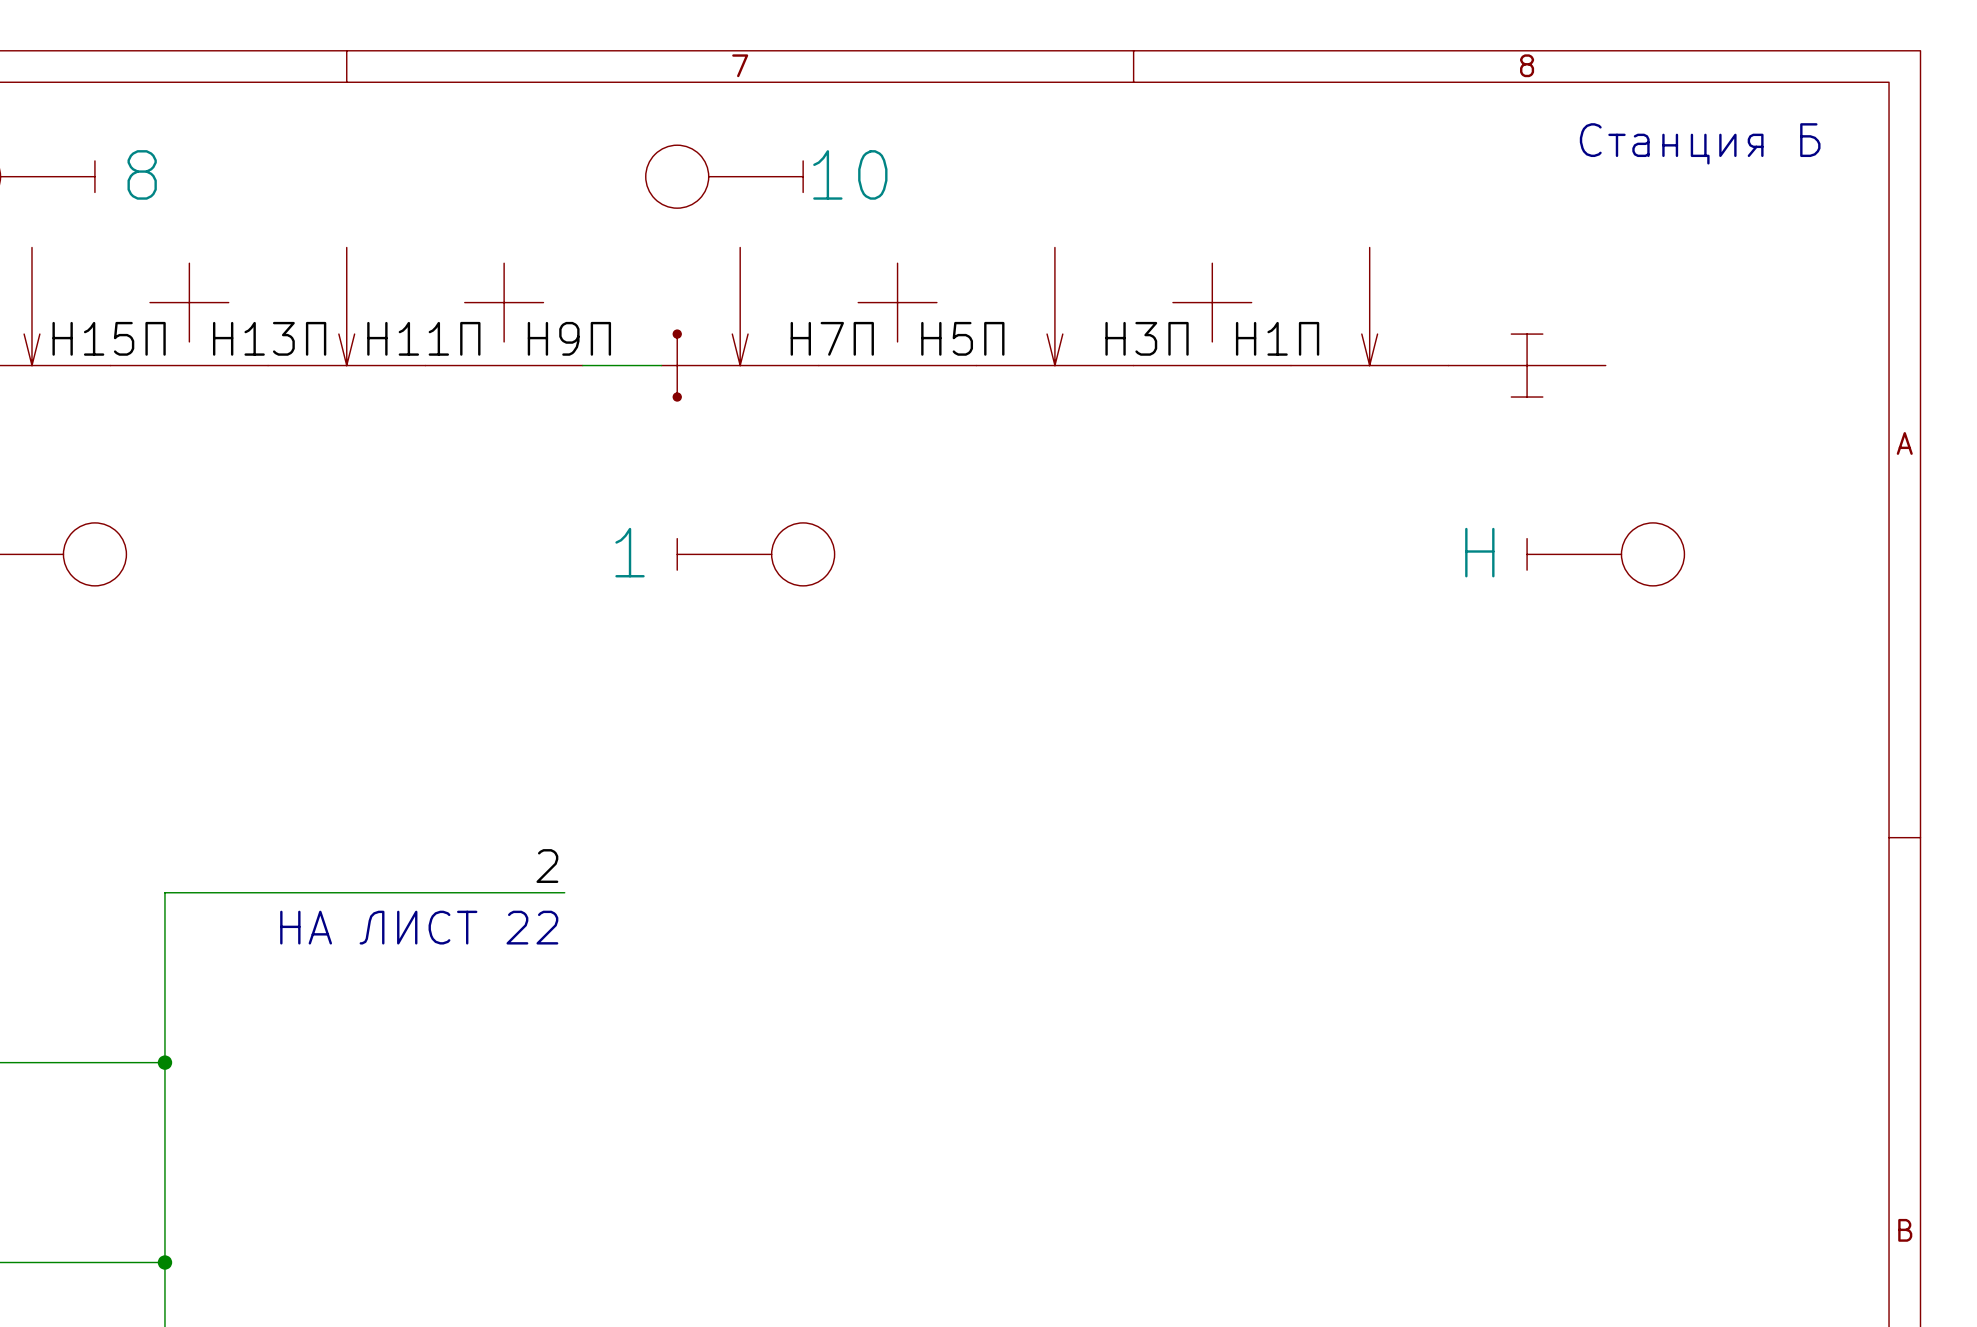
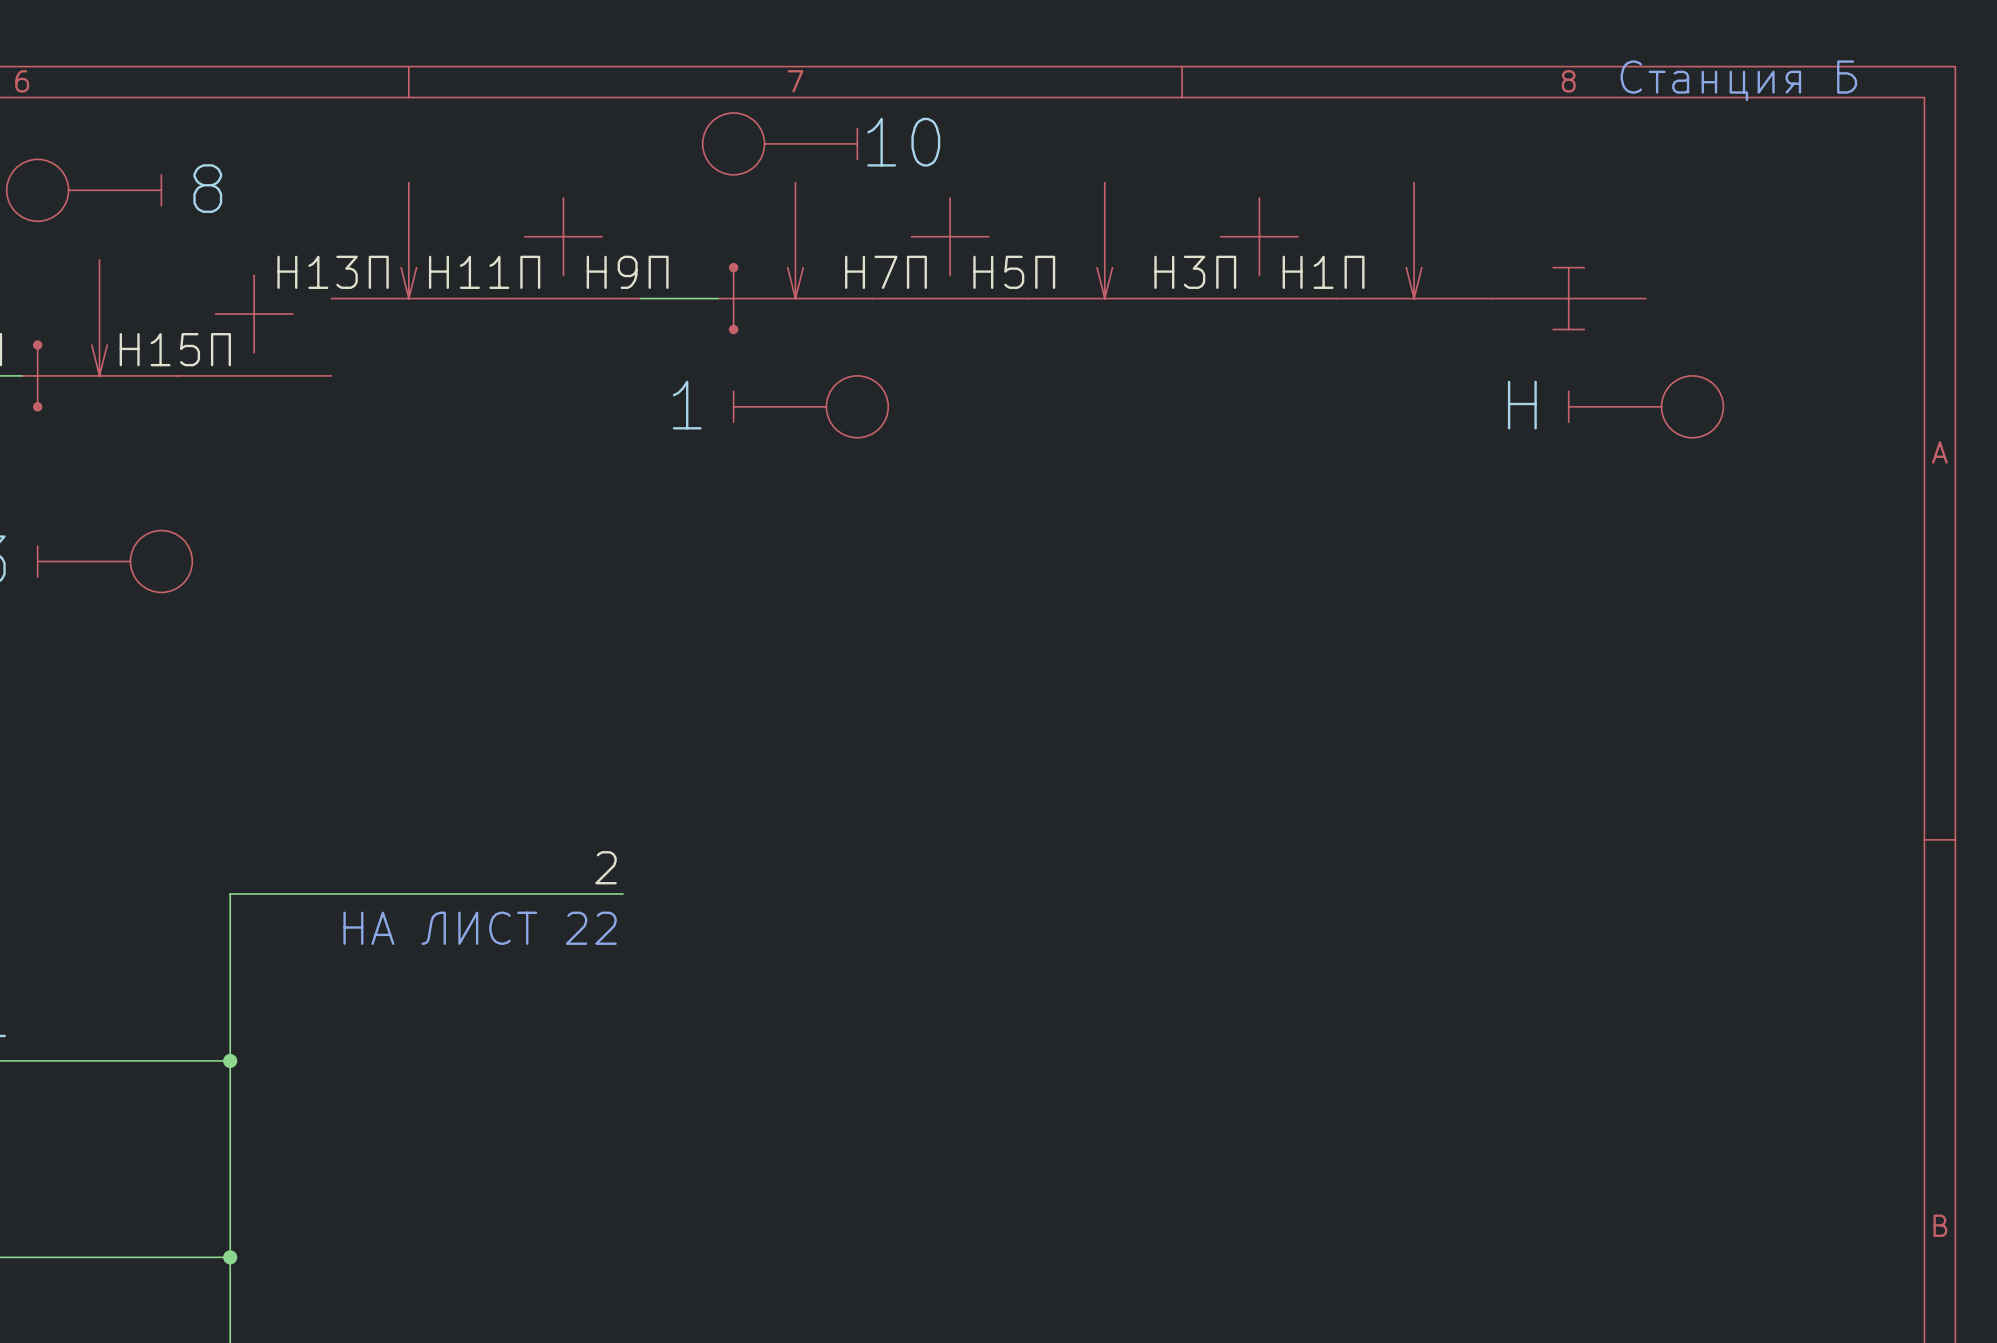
text position: Станция Б (1700, 143) -> Станция Б (1738, 80)
part position: (724, 176) -> (780, 143)
part position: (346, 306) -> (408, 240)
part position: (740, 306) -> (795, 240)
part position: (1054, 306) -> (1104, 240)
part position: (1369, 306) -> (1414, 240)
part position: (504, 314) -> (563, 248)
part position: (897, 314) -> (950, 248)
part position: (1212, 314) -> (1259, 248)
label position: Н13П (269, 338) -> Н13П (333, 272)
label position: Н11П (423, 338) -> Н11П (484, 272)
label position: Н9П (569, 338) -> Н9П (627, 272)
label position: Н7П (832, 338) -> Н7П (885, 272)
label position: Н5П (962, 338) -> Н5П (1014, 272)
label position: Н3П (1147, 338) -> Н3П (1195, 272)
label position: Н1П (1277, 338) -> Н1П (1323, 272)
wire: (582, 365) (661, 365) -> (640, 298) (718, 298)
part position: (677, 365) -> (733, 298)
part position: (1527, 365) -> (1568, 298)
part position: (755, 554) -> (810, 406)
part position: (1605, 554) -> (1646, 406)

